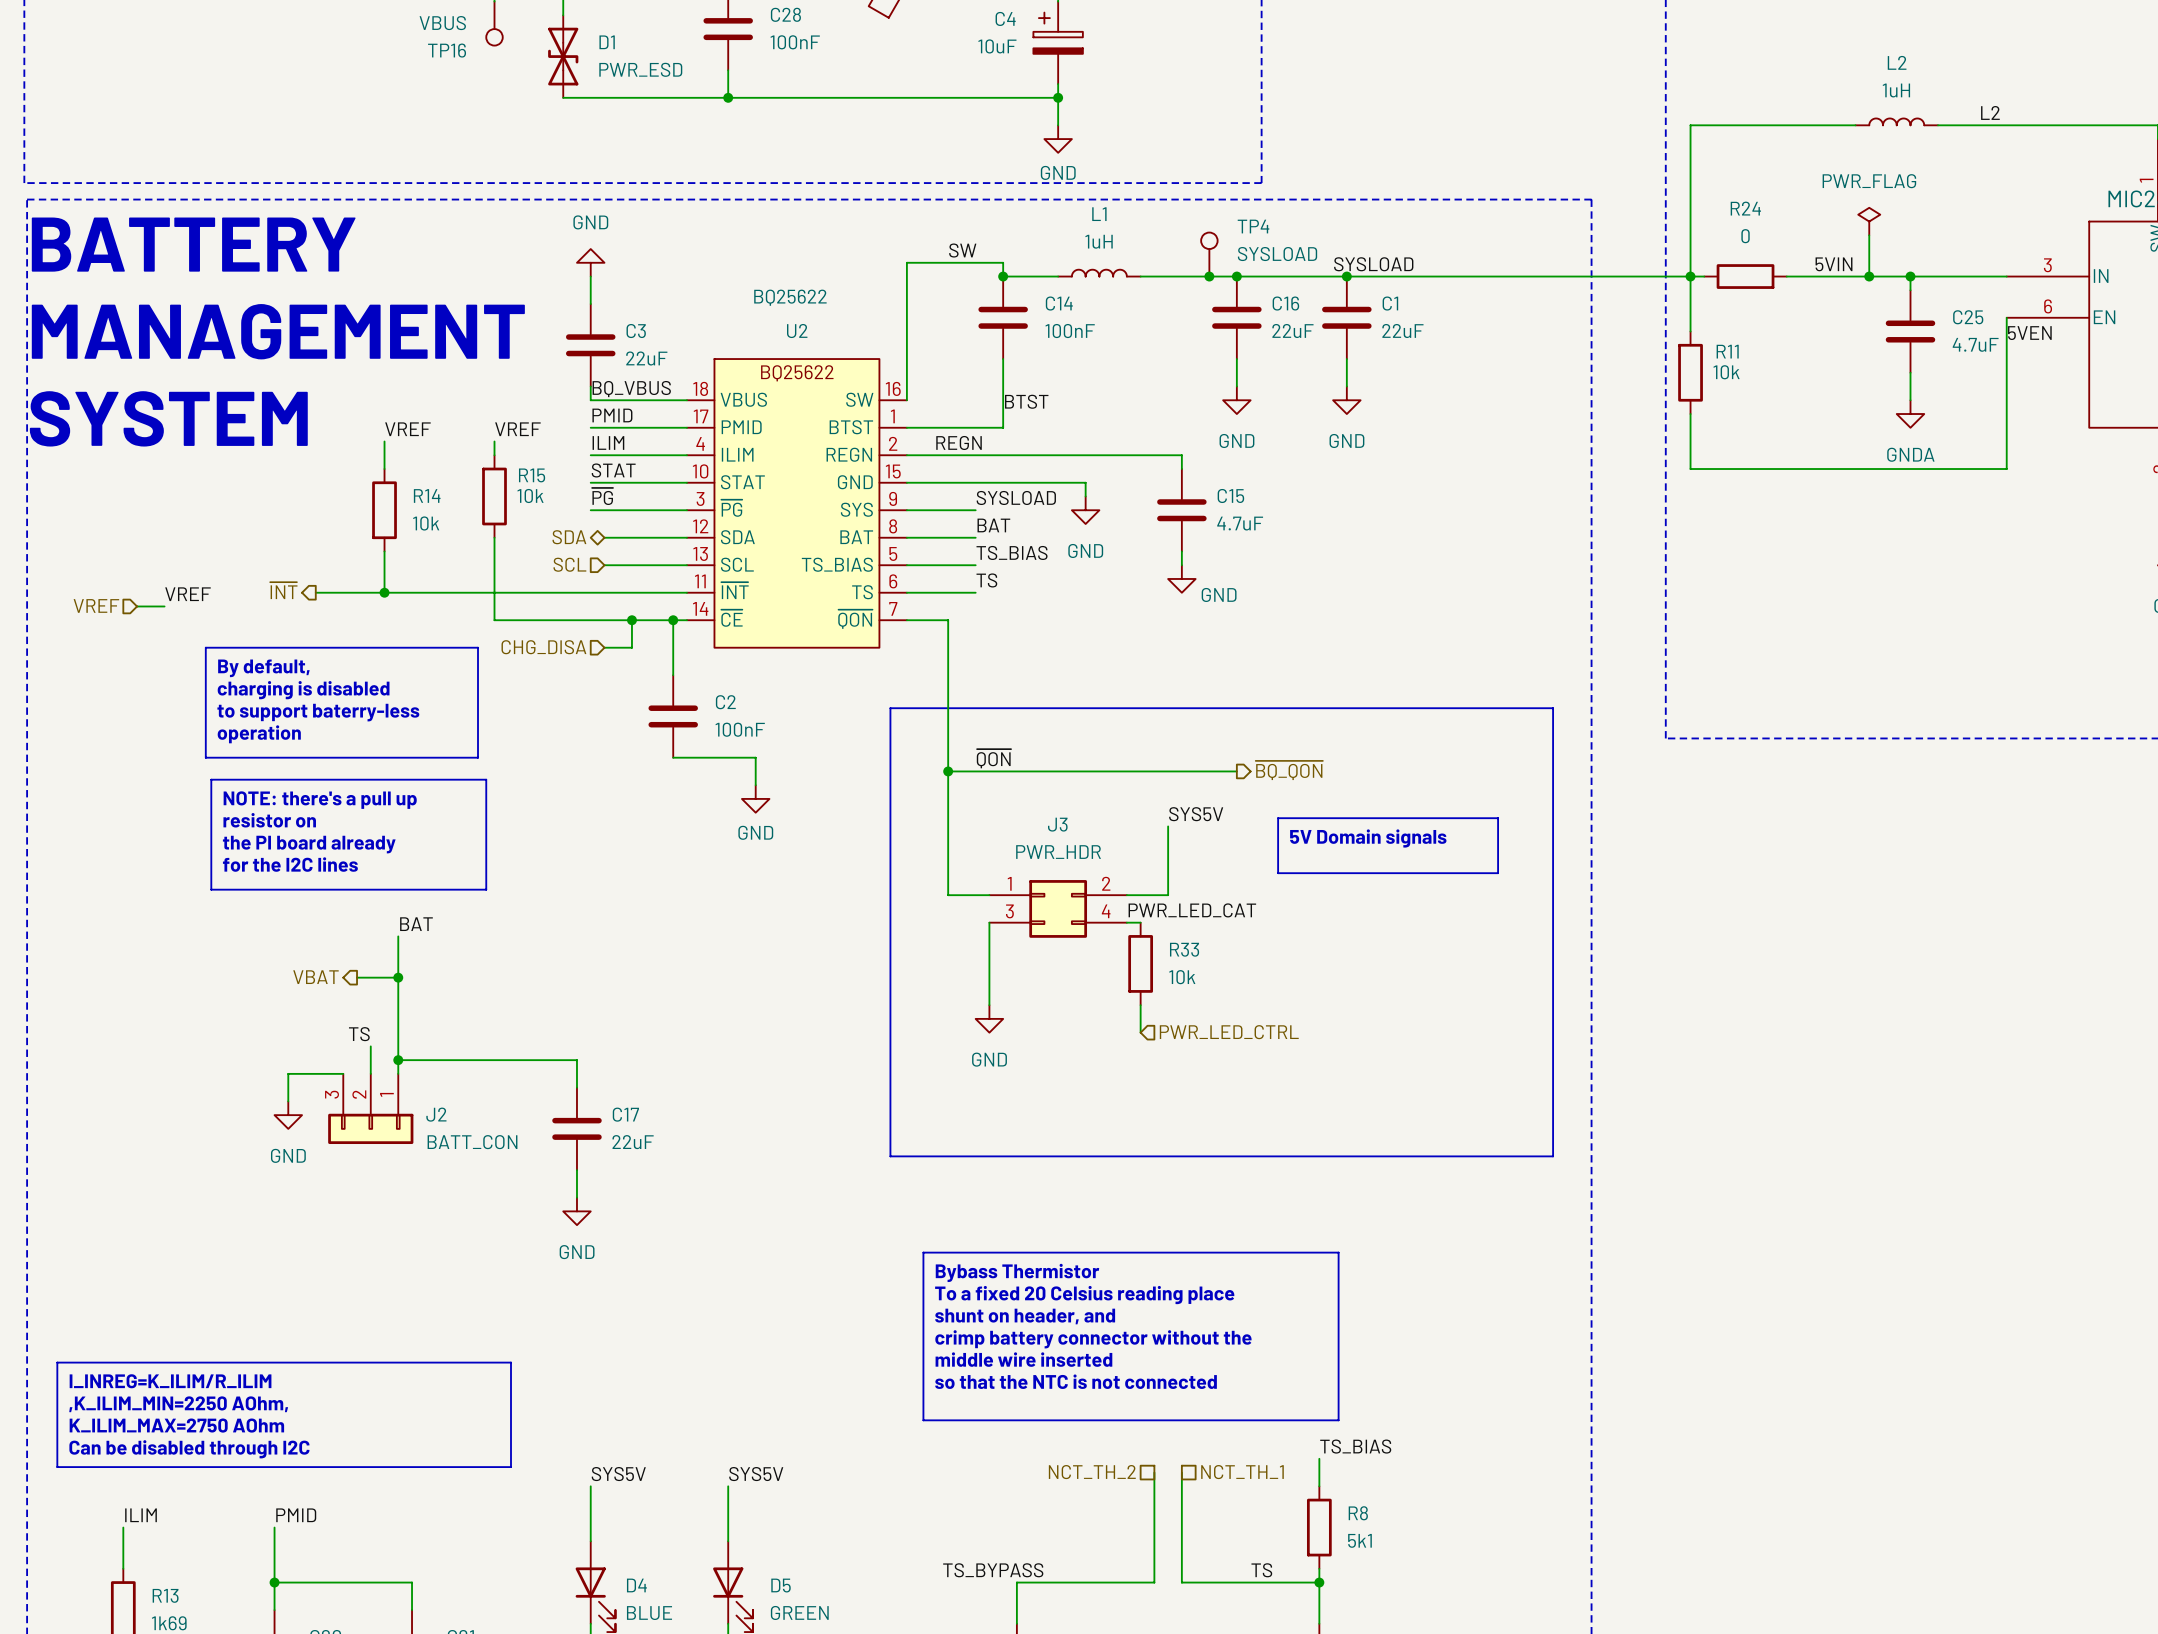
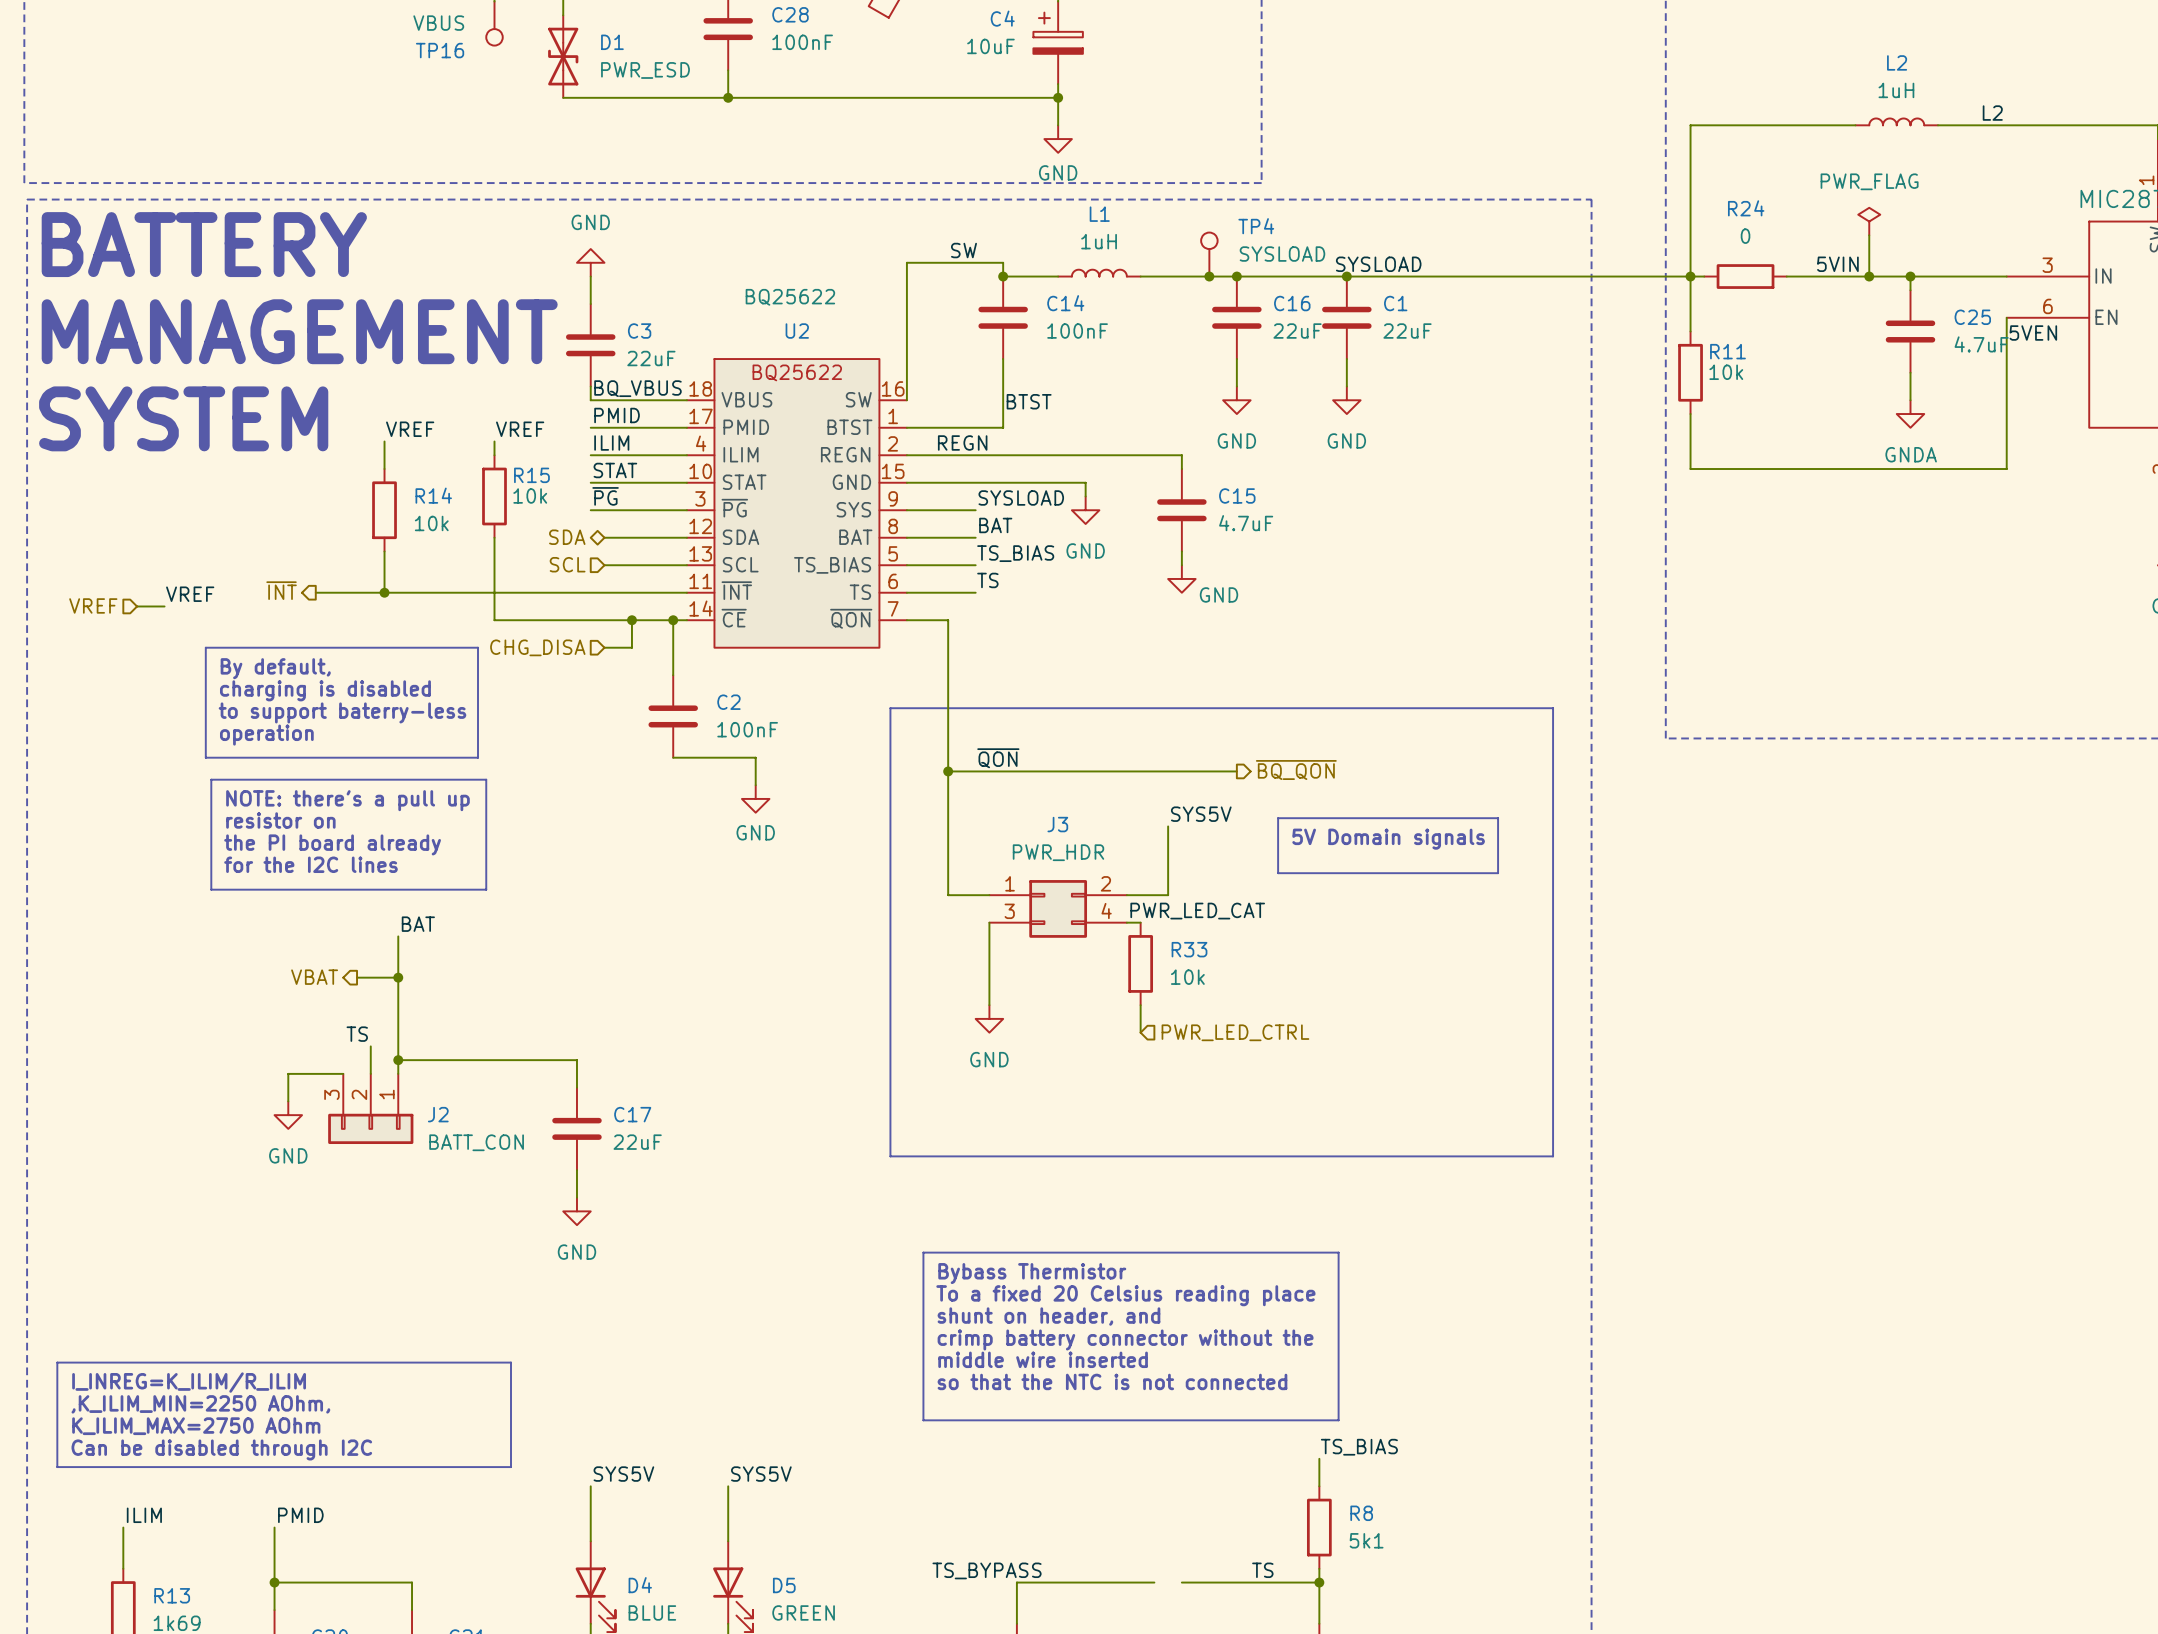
hierarchical label: NCT_TH_2 (1092, 1472) -> none
wire: (1154, 1472) (1154, 1582) -> none
wire: (1181, 1472) (1181, 1582) -> none
hierarchical label: NCT_TH_1 (1242, 1472) -> none

